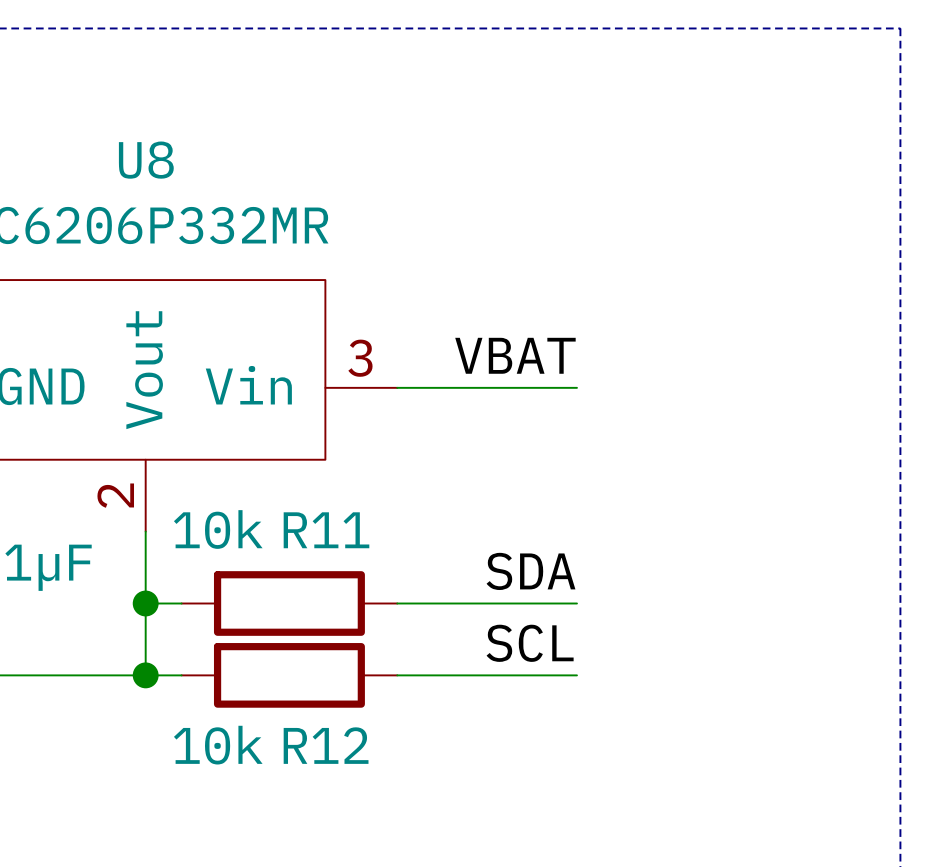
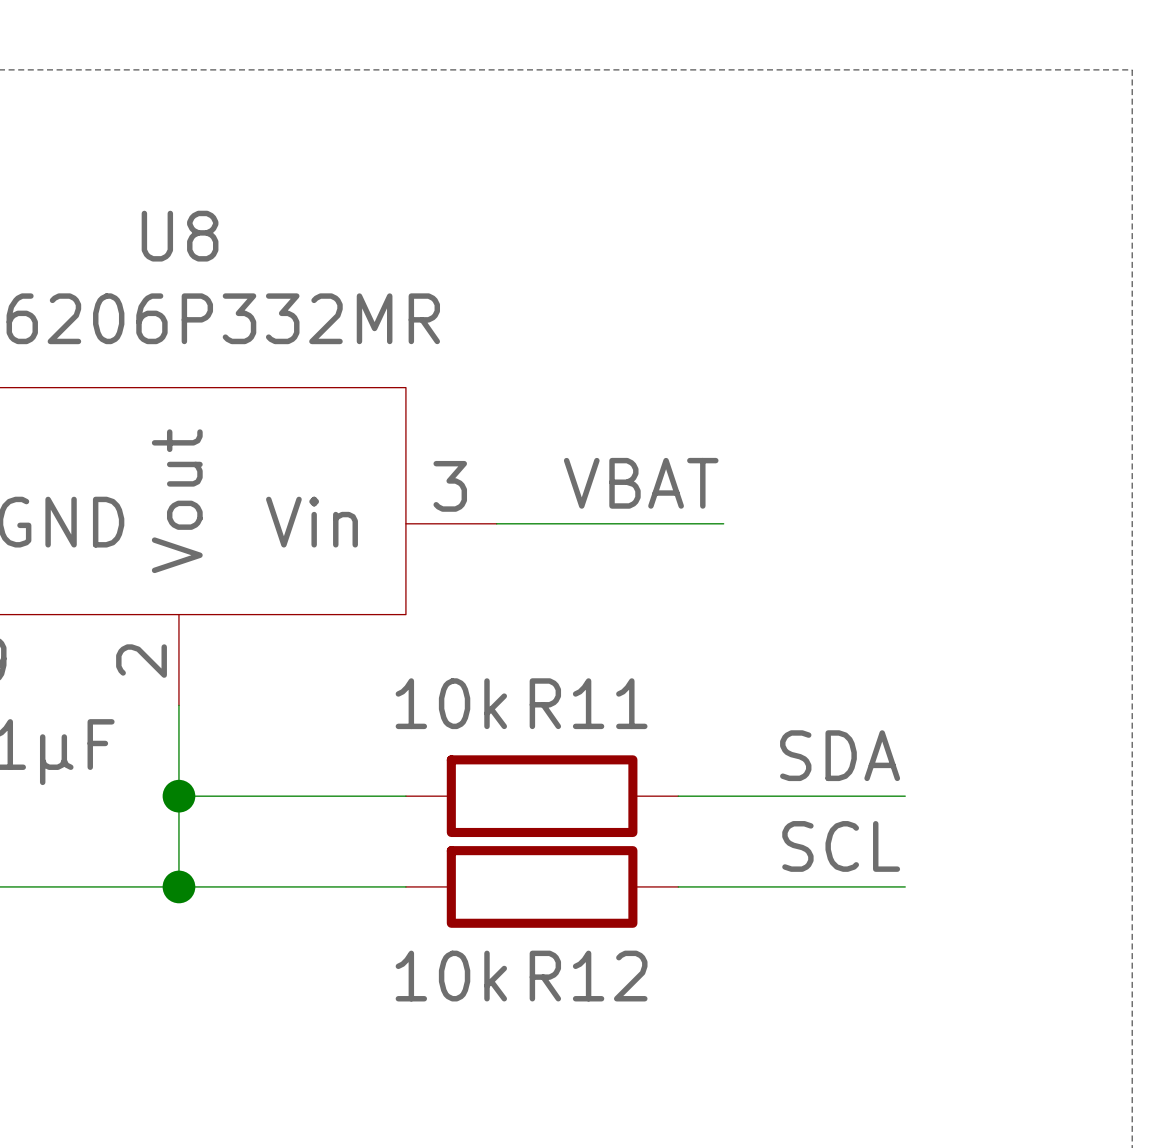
label position: SDA (531, 571) -> SDA (840, 755)
wire: none -> (224, 796) (405, 796)
R11 position: (289, 603) -> (542, 796)
wire: (397, 603) (541, 603) -> (723, 796) (905, 796)
label position: SCL (530, 643) -> SCL (841, 846)
wire: none -> (224, 886) (405, 886)
R12 position: (289, 675) -> (542, 886)
wire: (397, 675) (541, 675) -> (723, 886) (905, 886)

